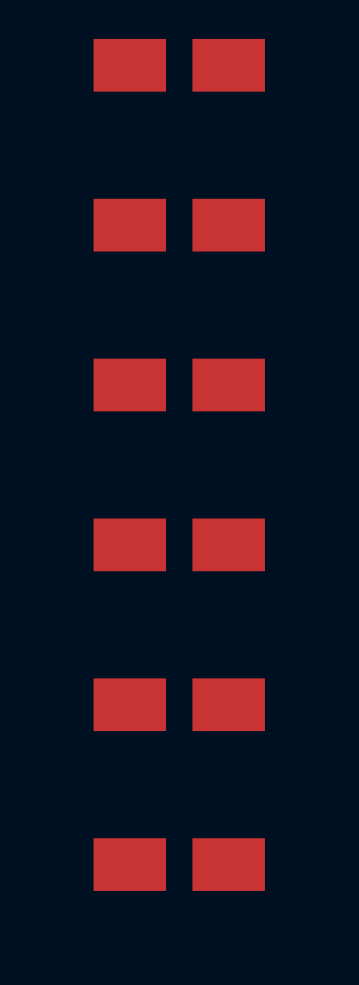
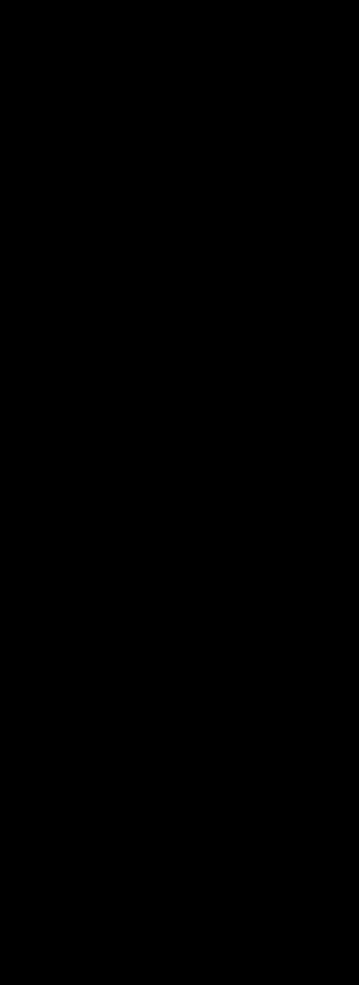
part: (179, 65) -> none
part: (179, 225) -> none
part: (179, 385) -> none
part: (179, 544) -> none
part: (179, 704) -> none
part: (179, 864) -> none

